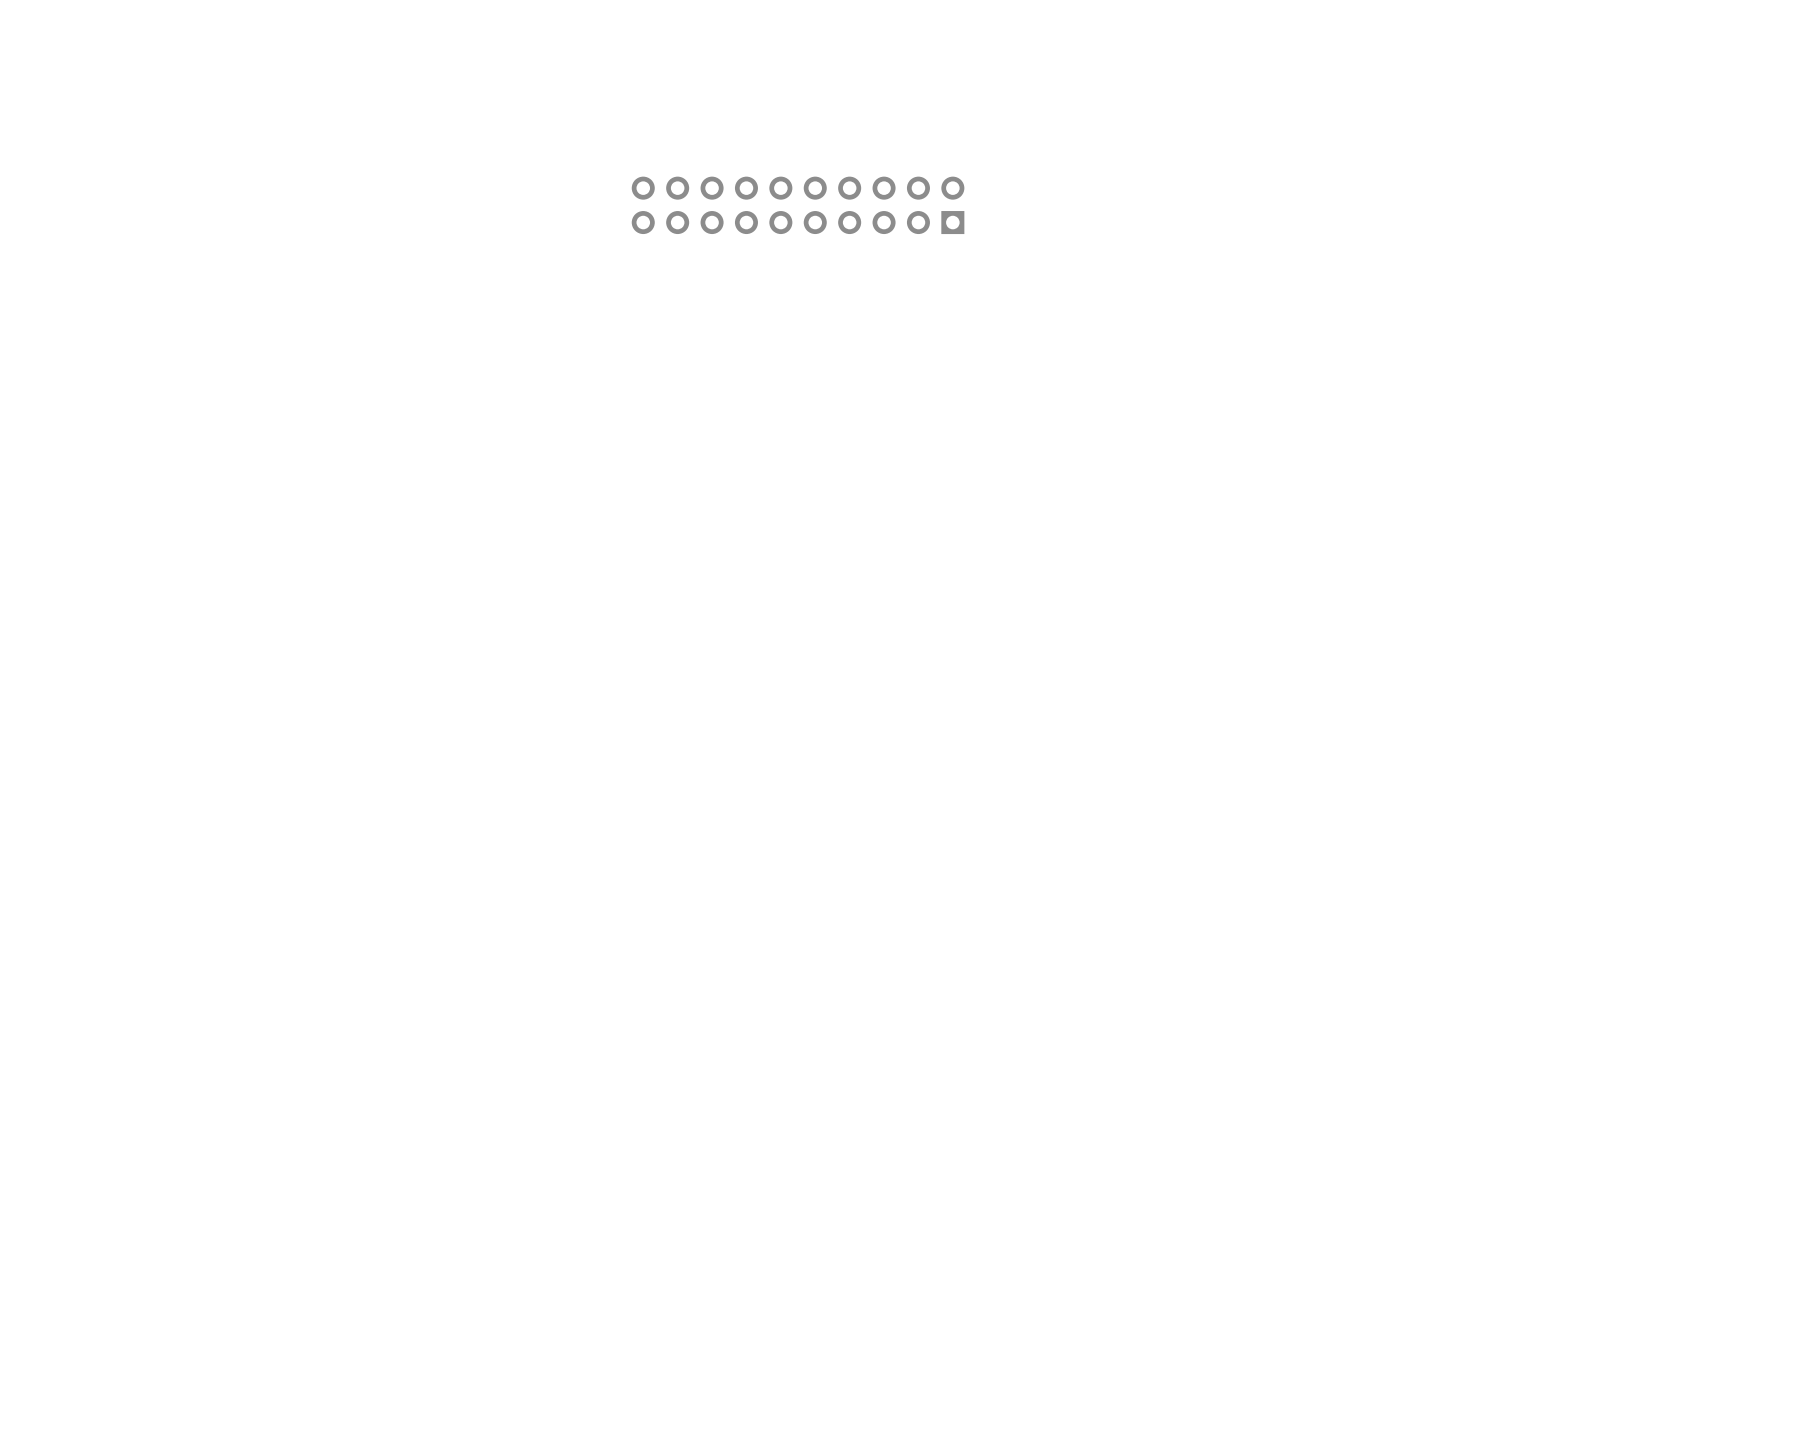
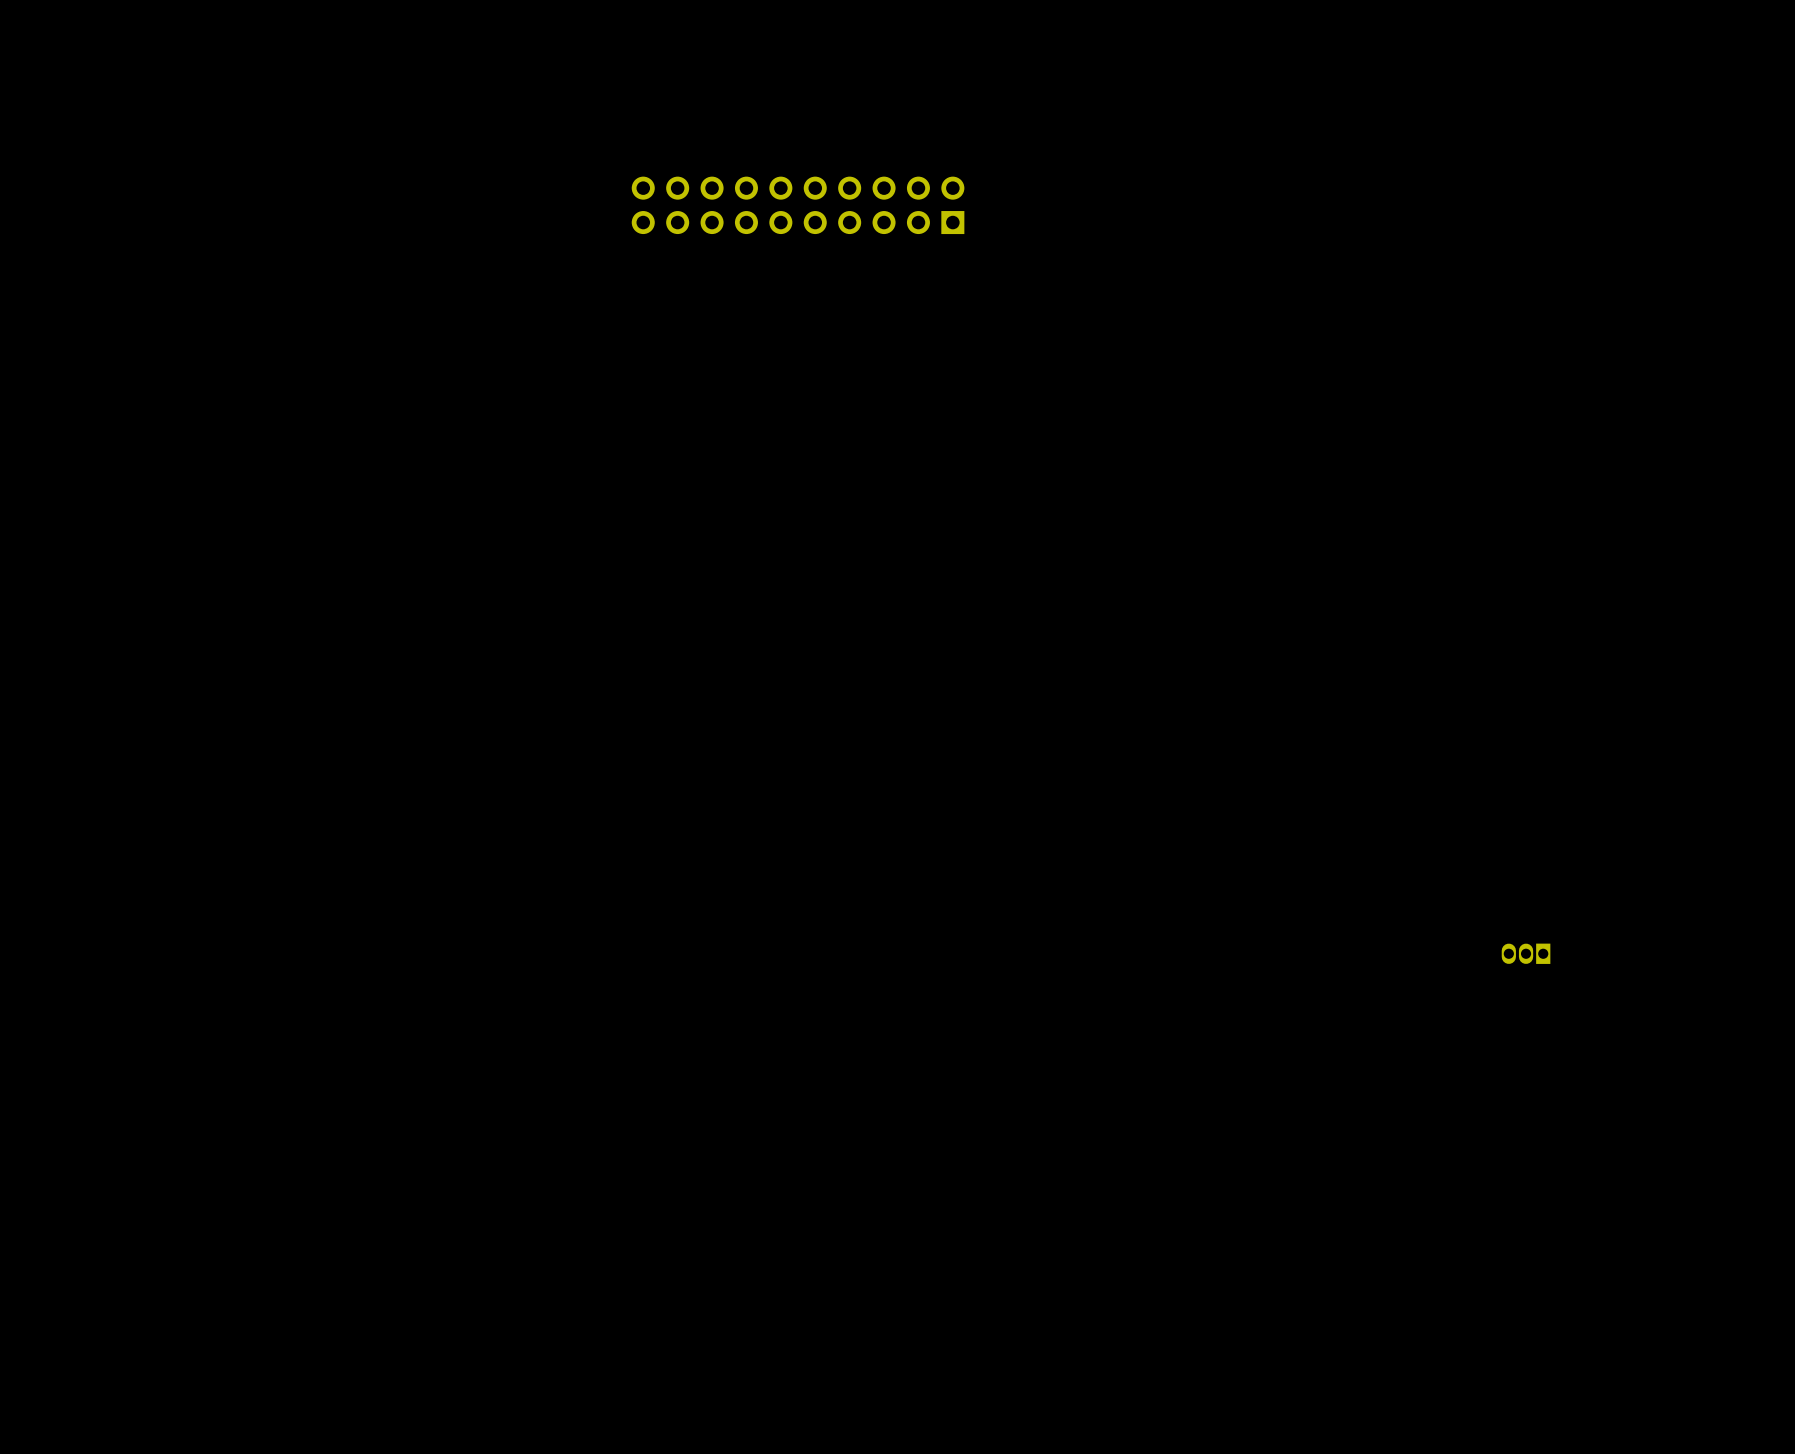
part: none -> (1526, 953)

